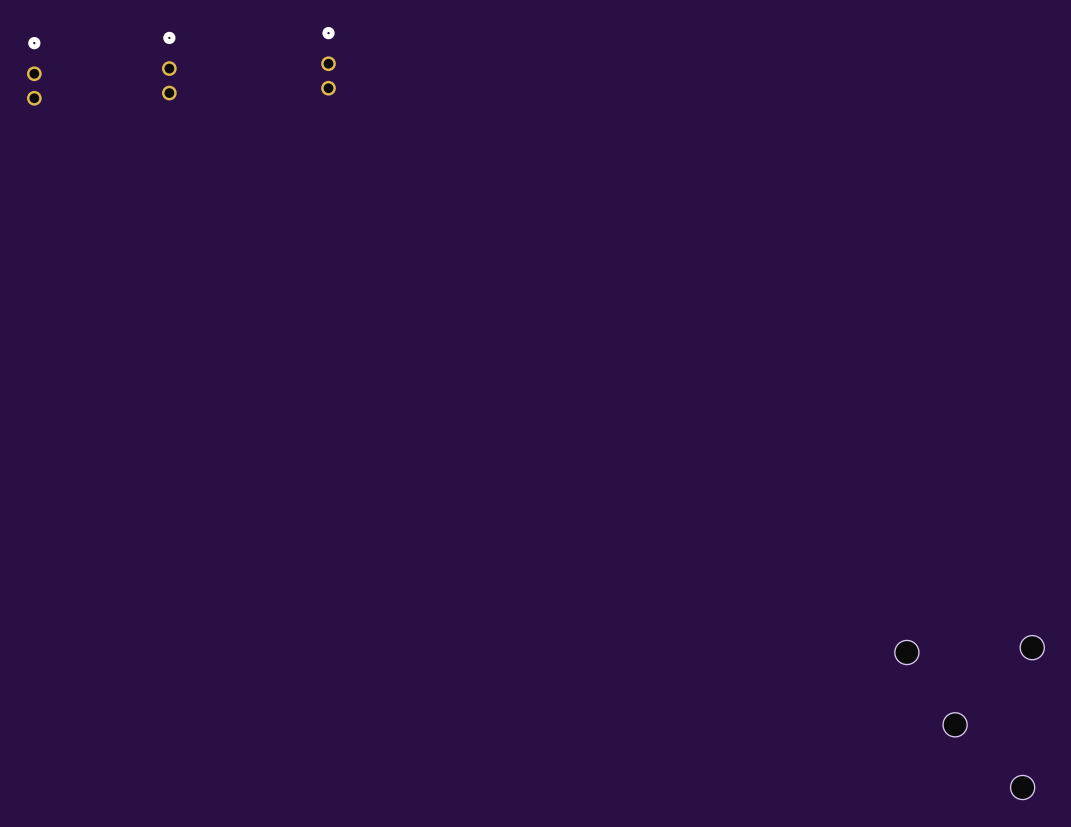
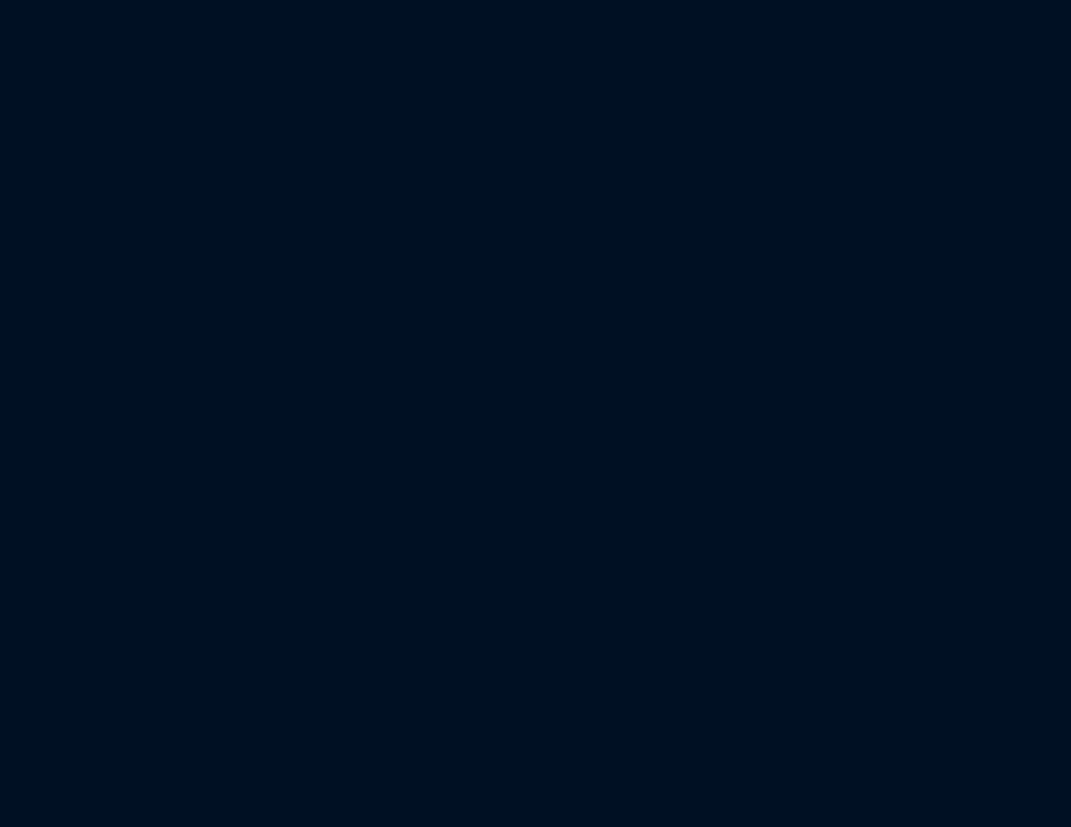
part: (328, 61) -> none
part: (169, 66) -> none
part: (34, 71) -> none
part: (1032, 647) -> none
part: (906, 652) -> none
part: (955, 724) -> none
part: (1022, 787) -> none

